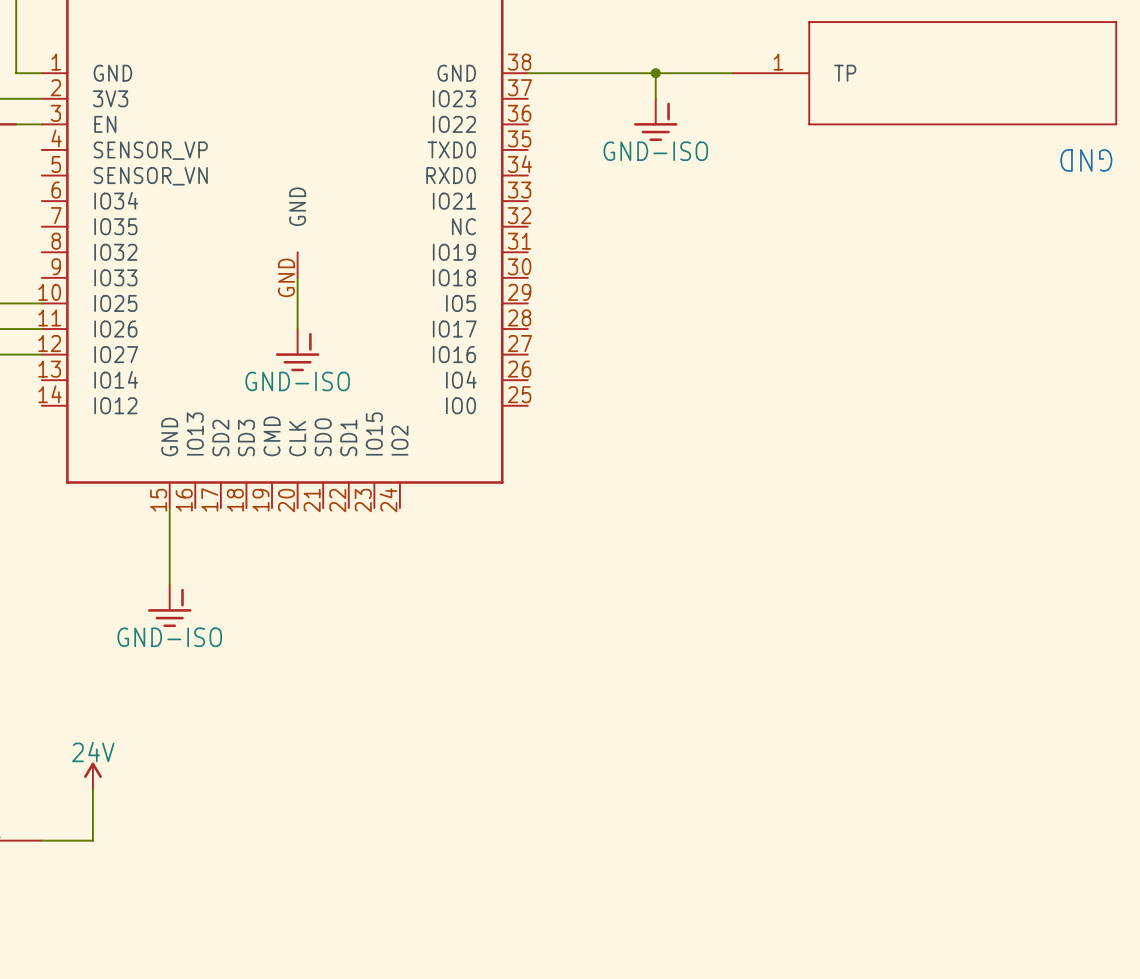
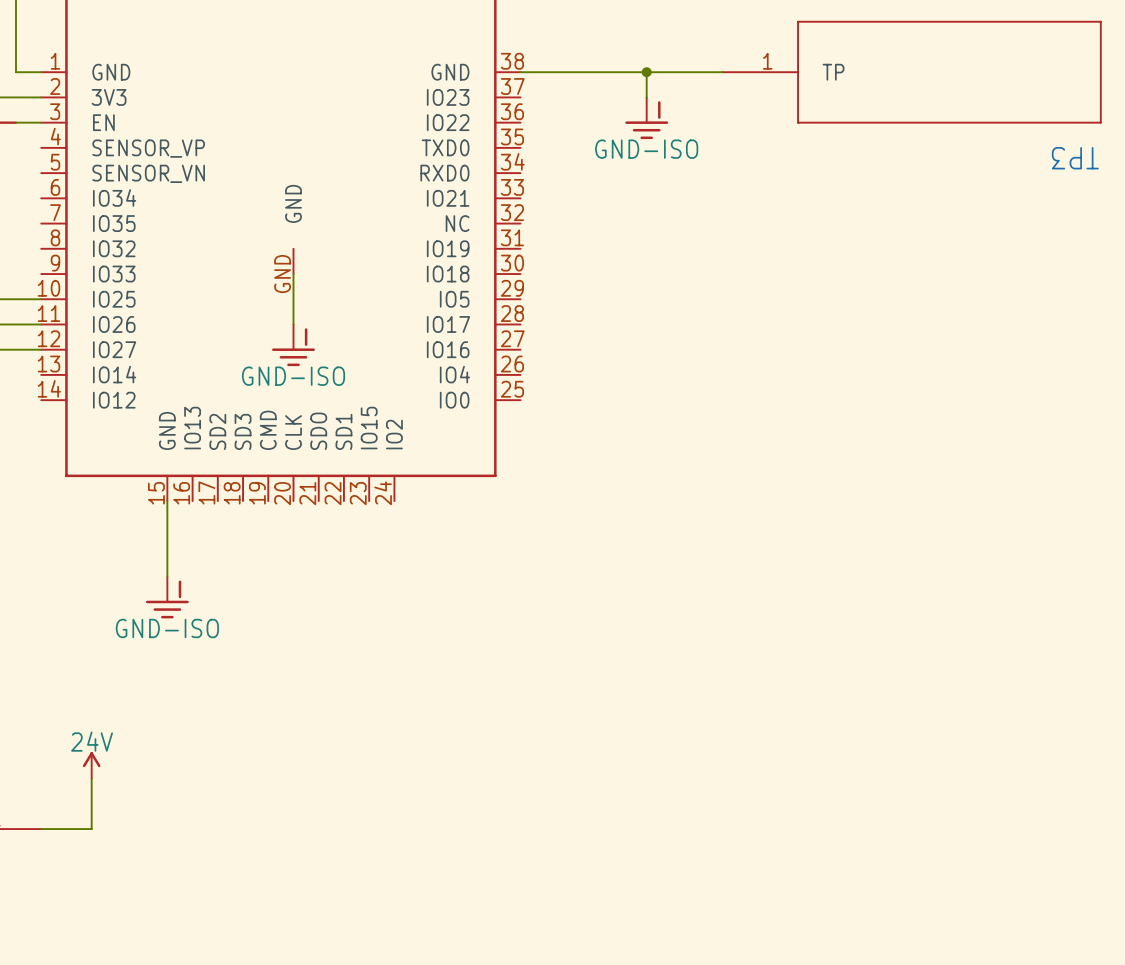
GND name: GND (1086, 160) -> TP3 (1075, 158)

